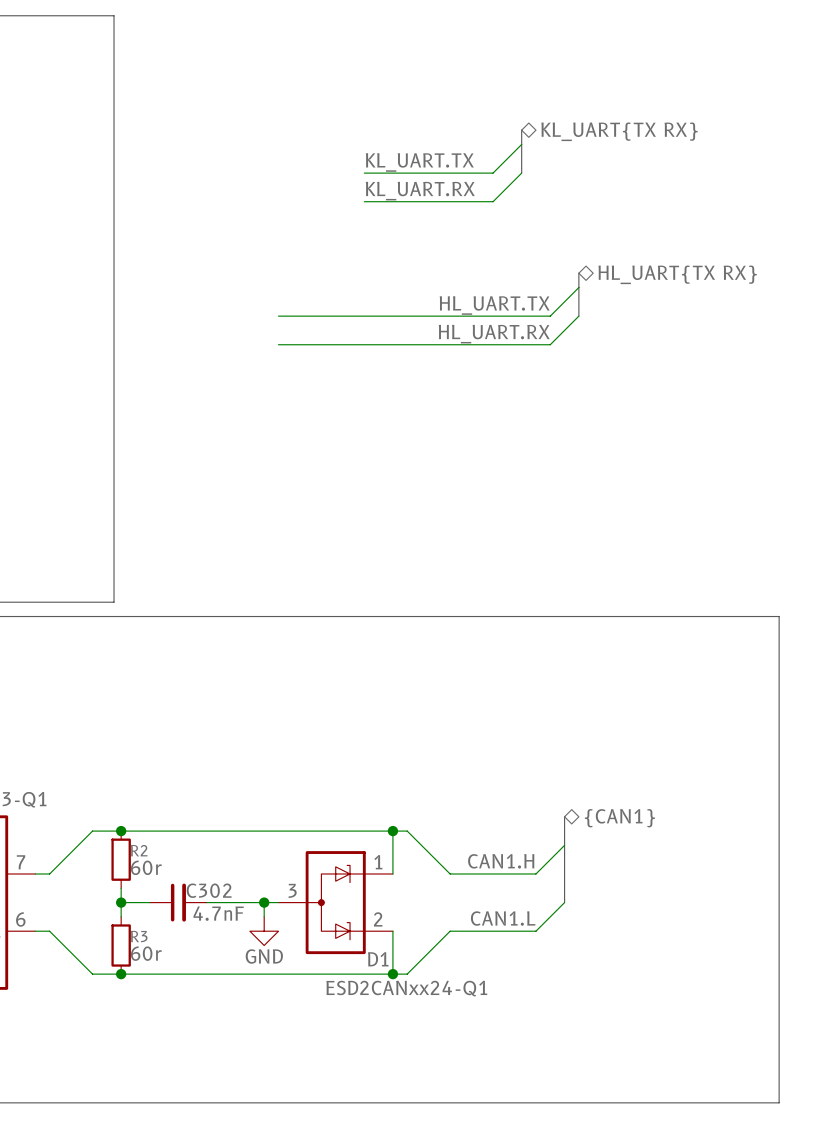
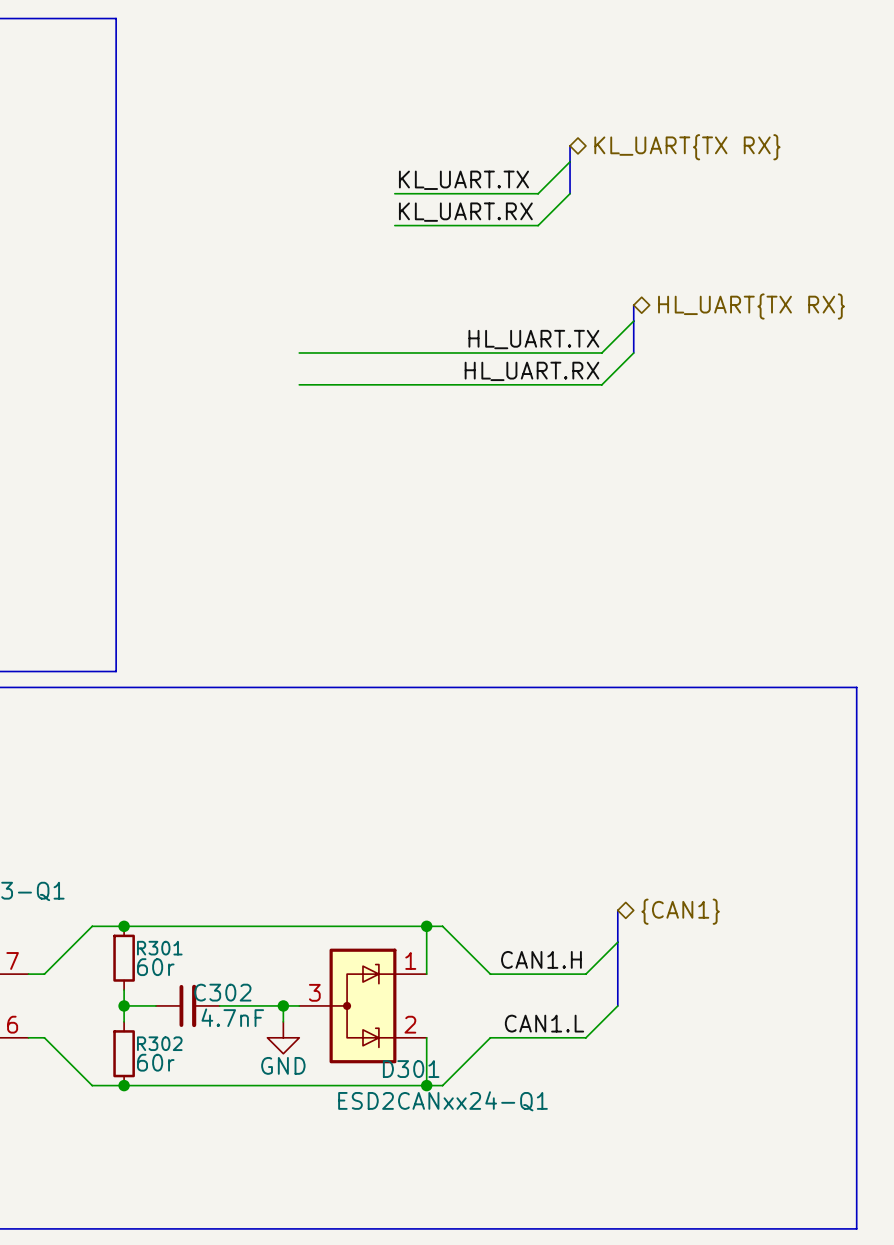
R2 name: R2 (139, 850) -> R301 (159, 948)
R3 name: R3 (139, 936) -> R302 (159, 1043)
D1 name: D1 (378, 959) -> D301 (411, 1069)

